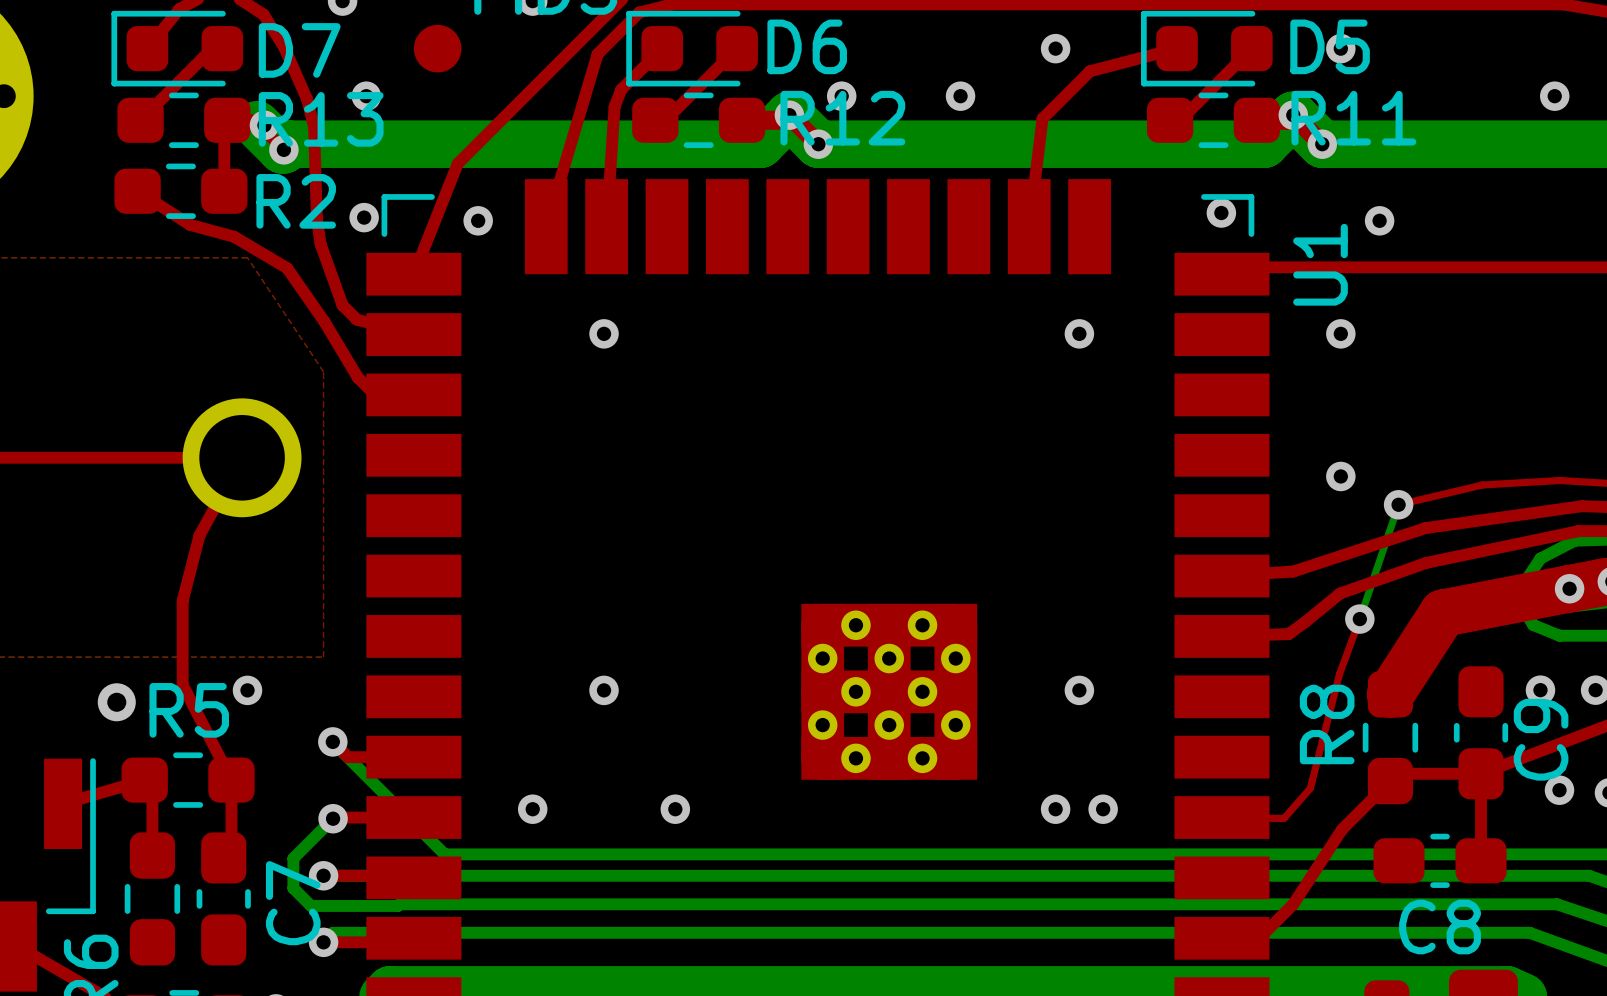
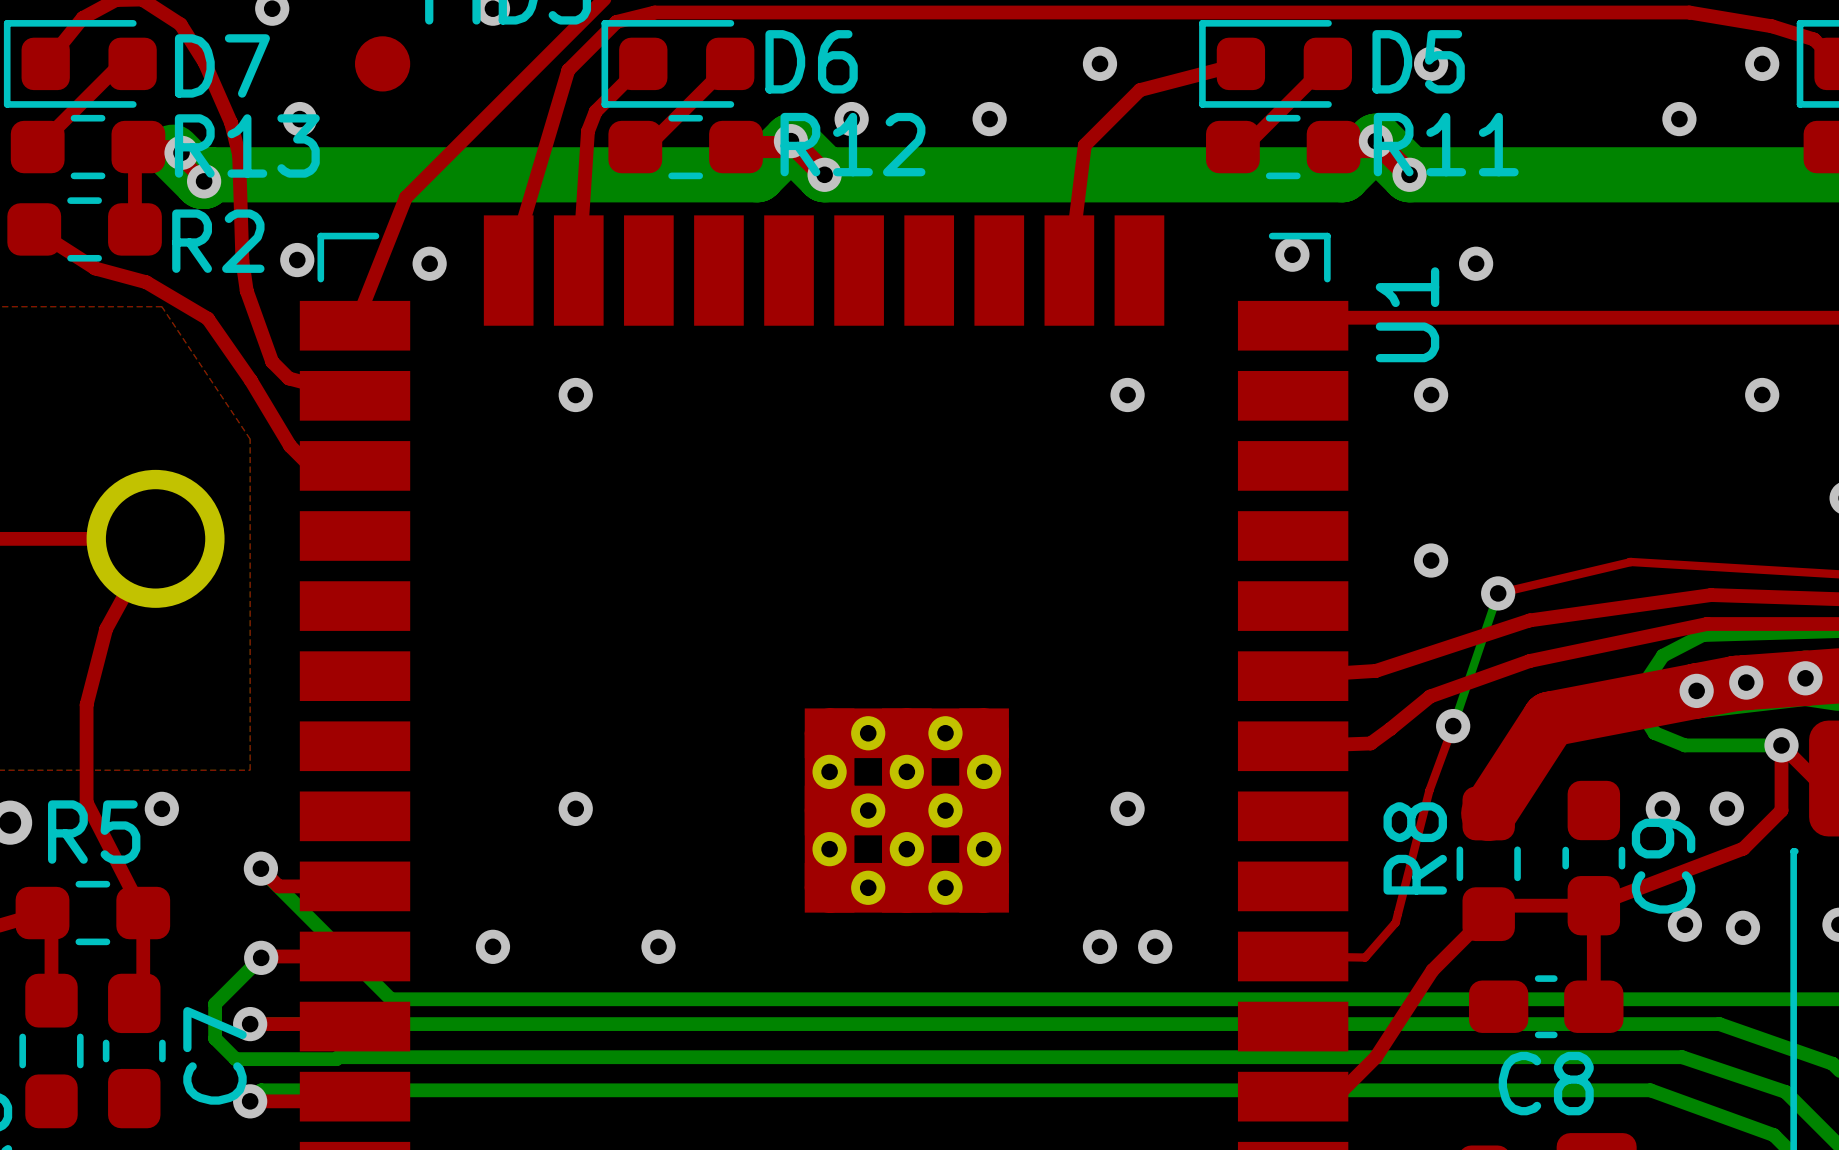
top track: none -> (1631, 562) (1595, 570)
top track: (1560, 480) (1482, 484) -> (1685, 565) (1629, 561)

